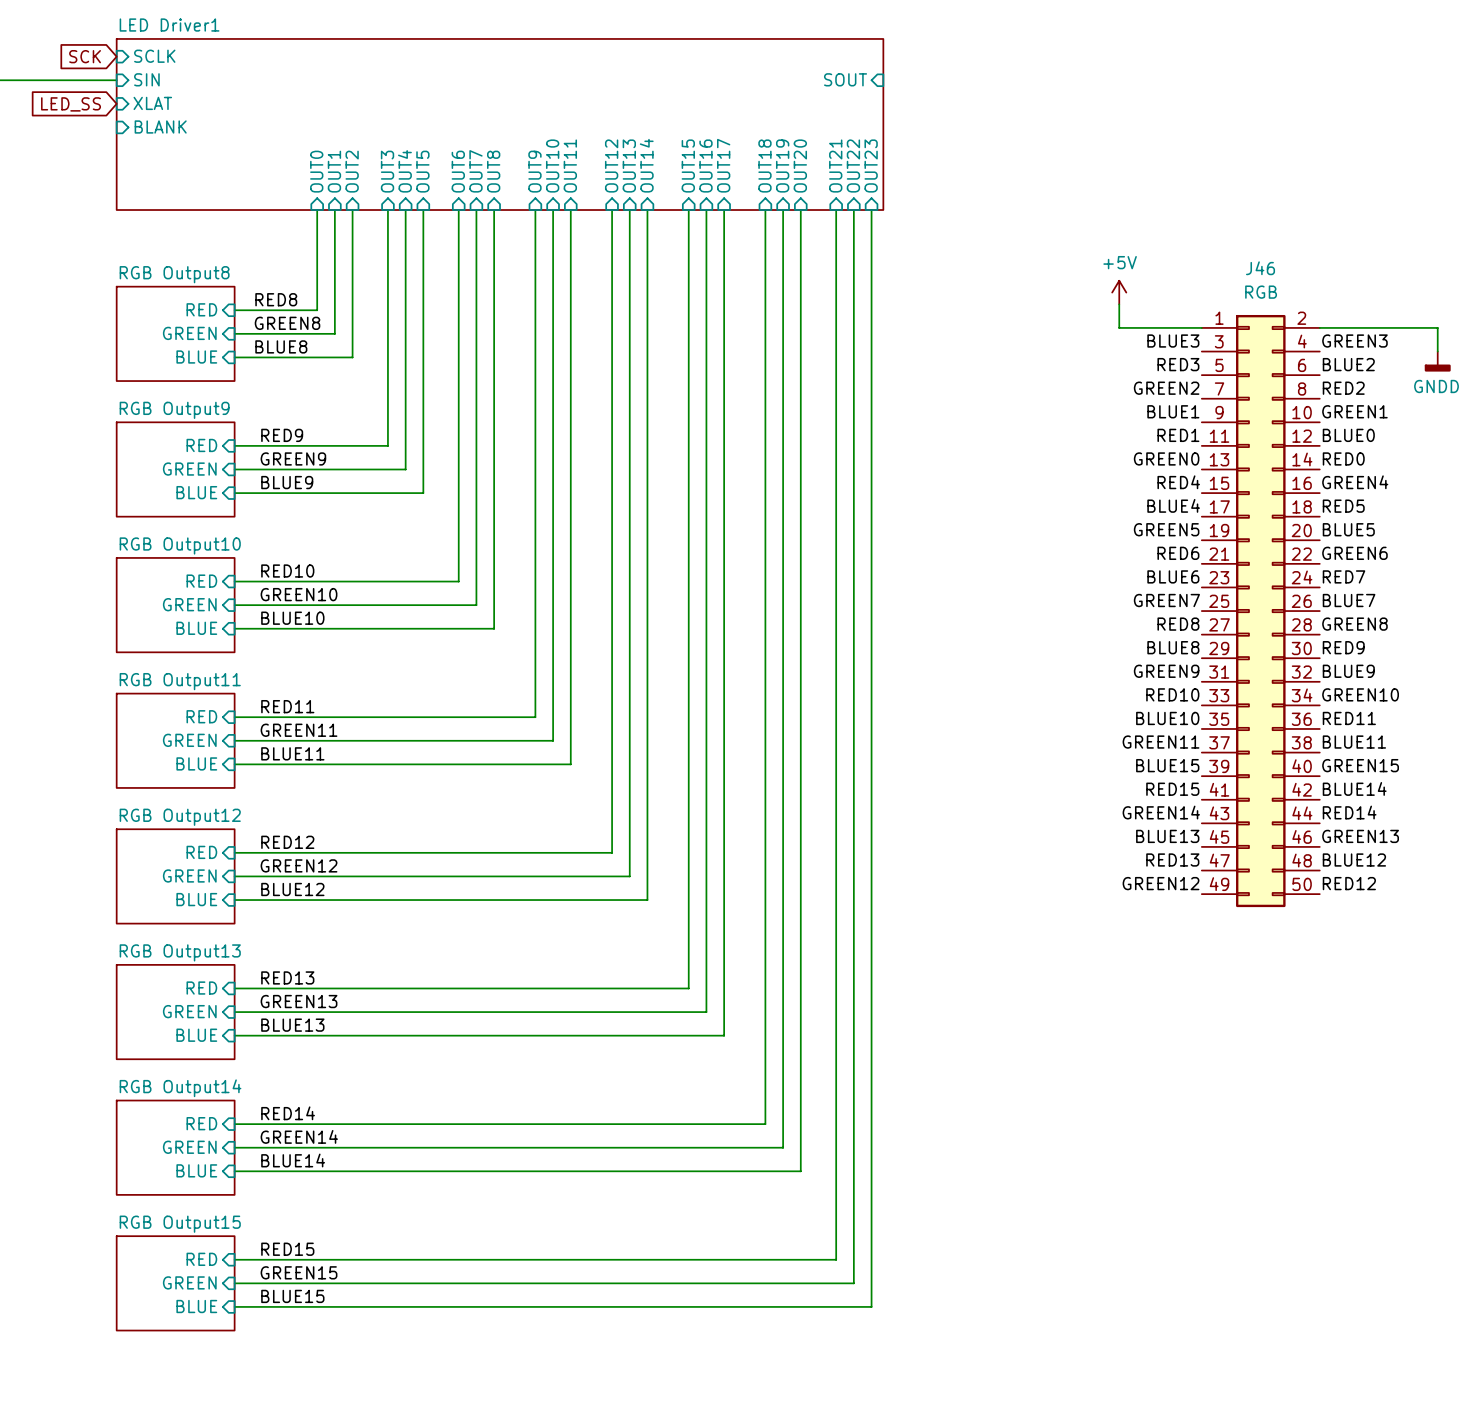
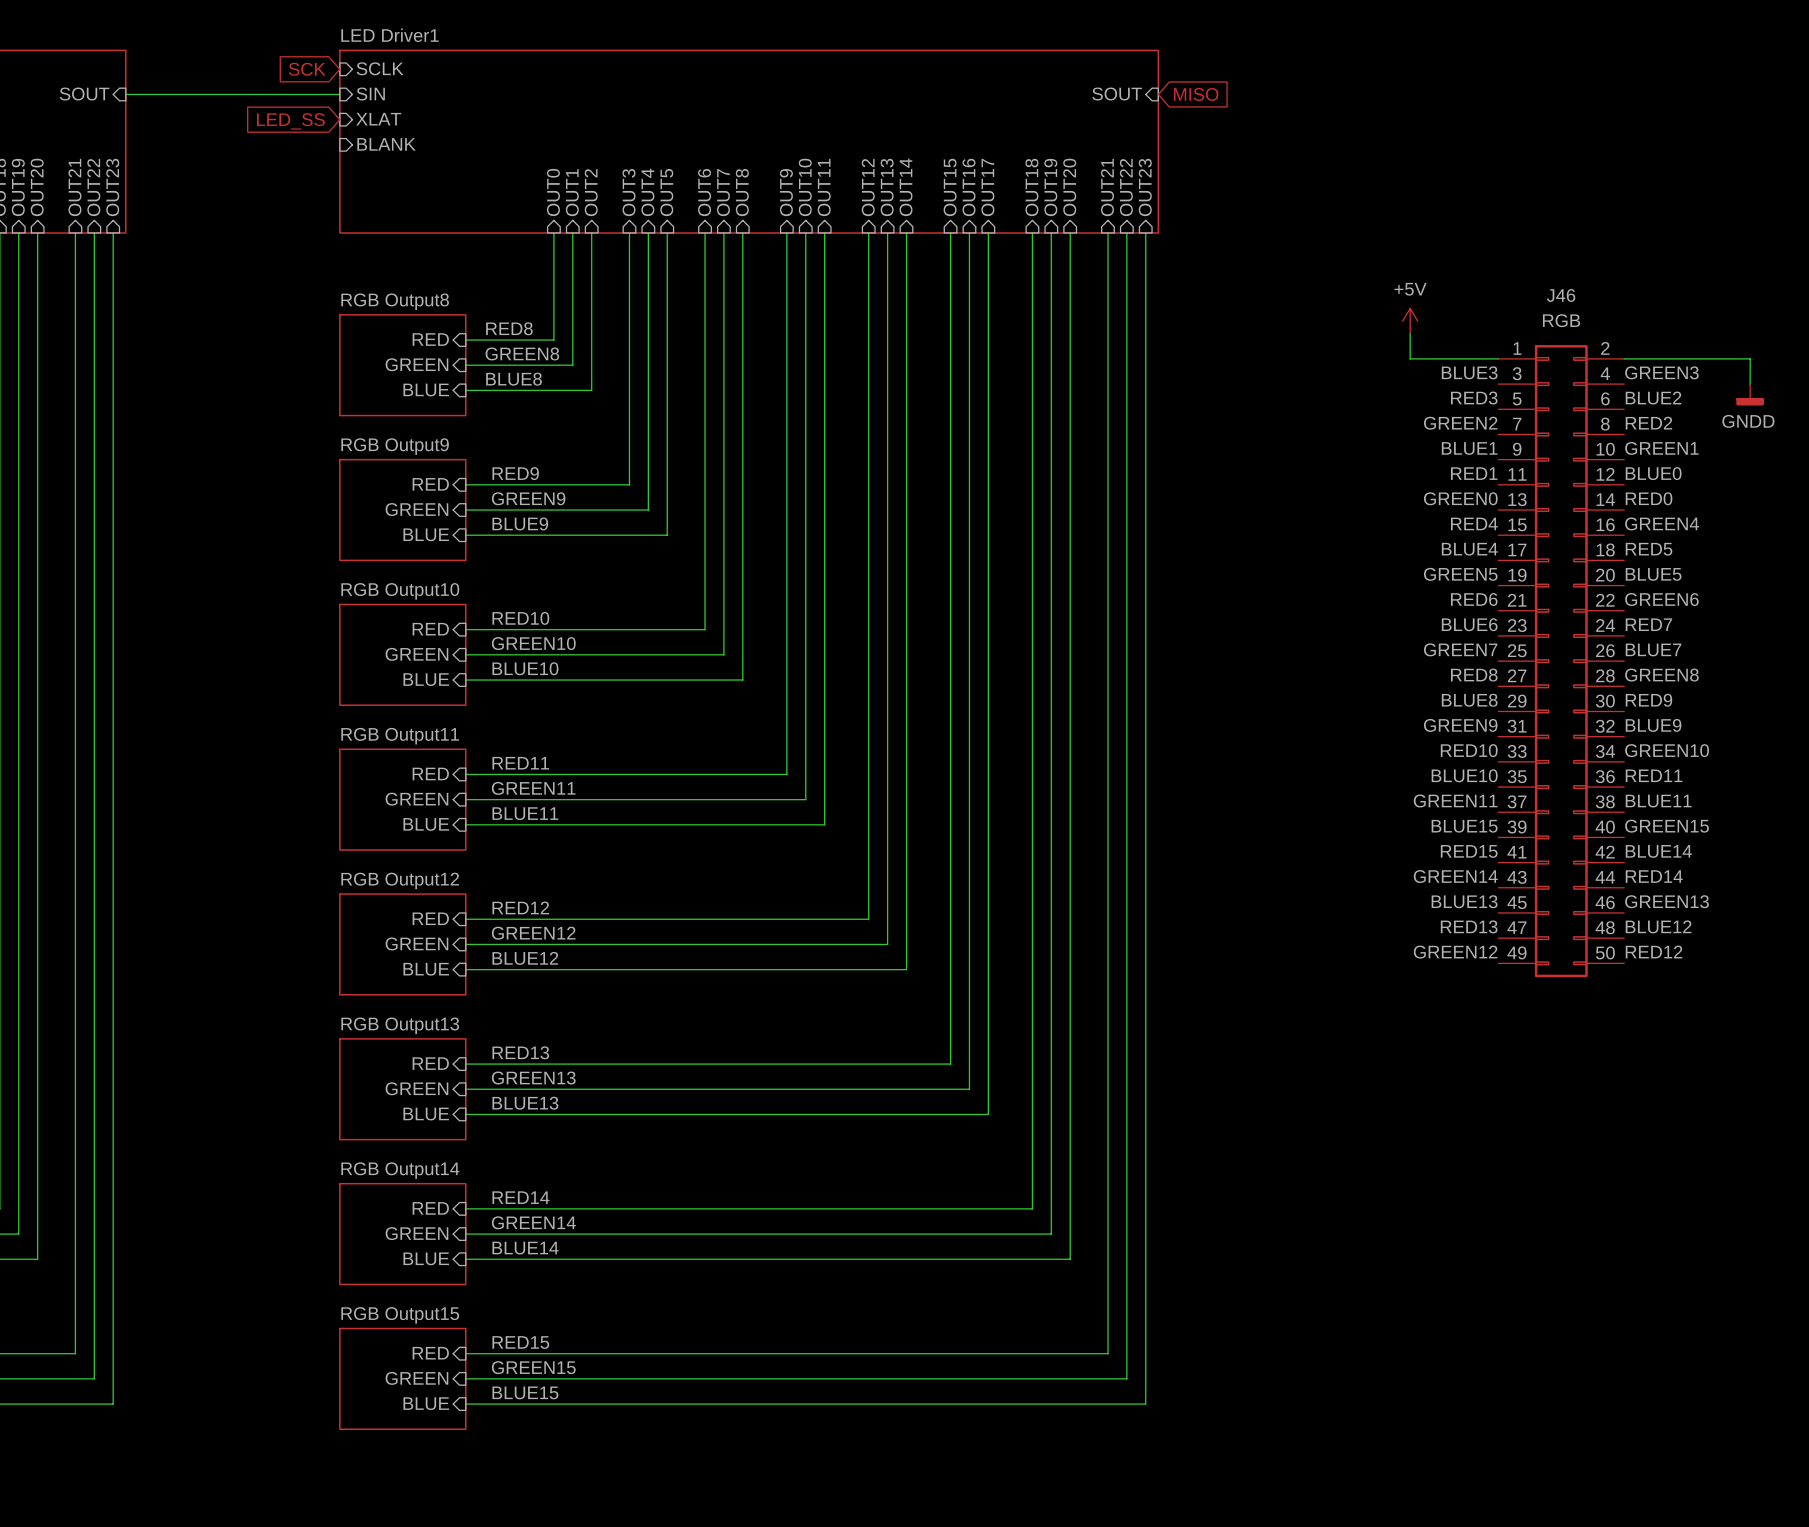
global label: none -> MISO (1196, 94)

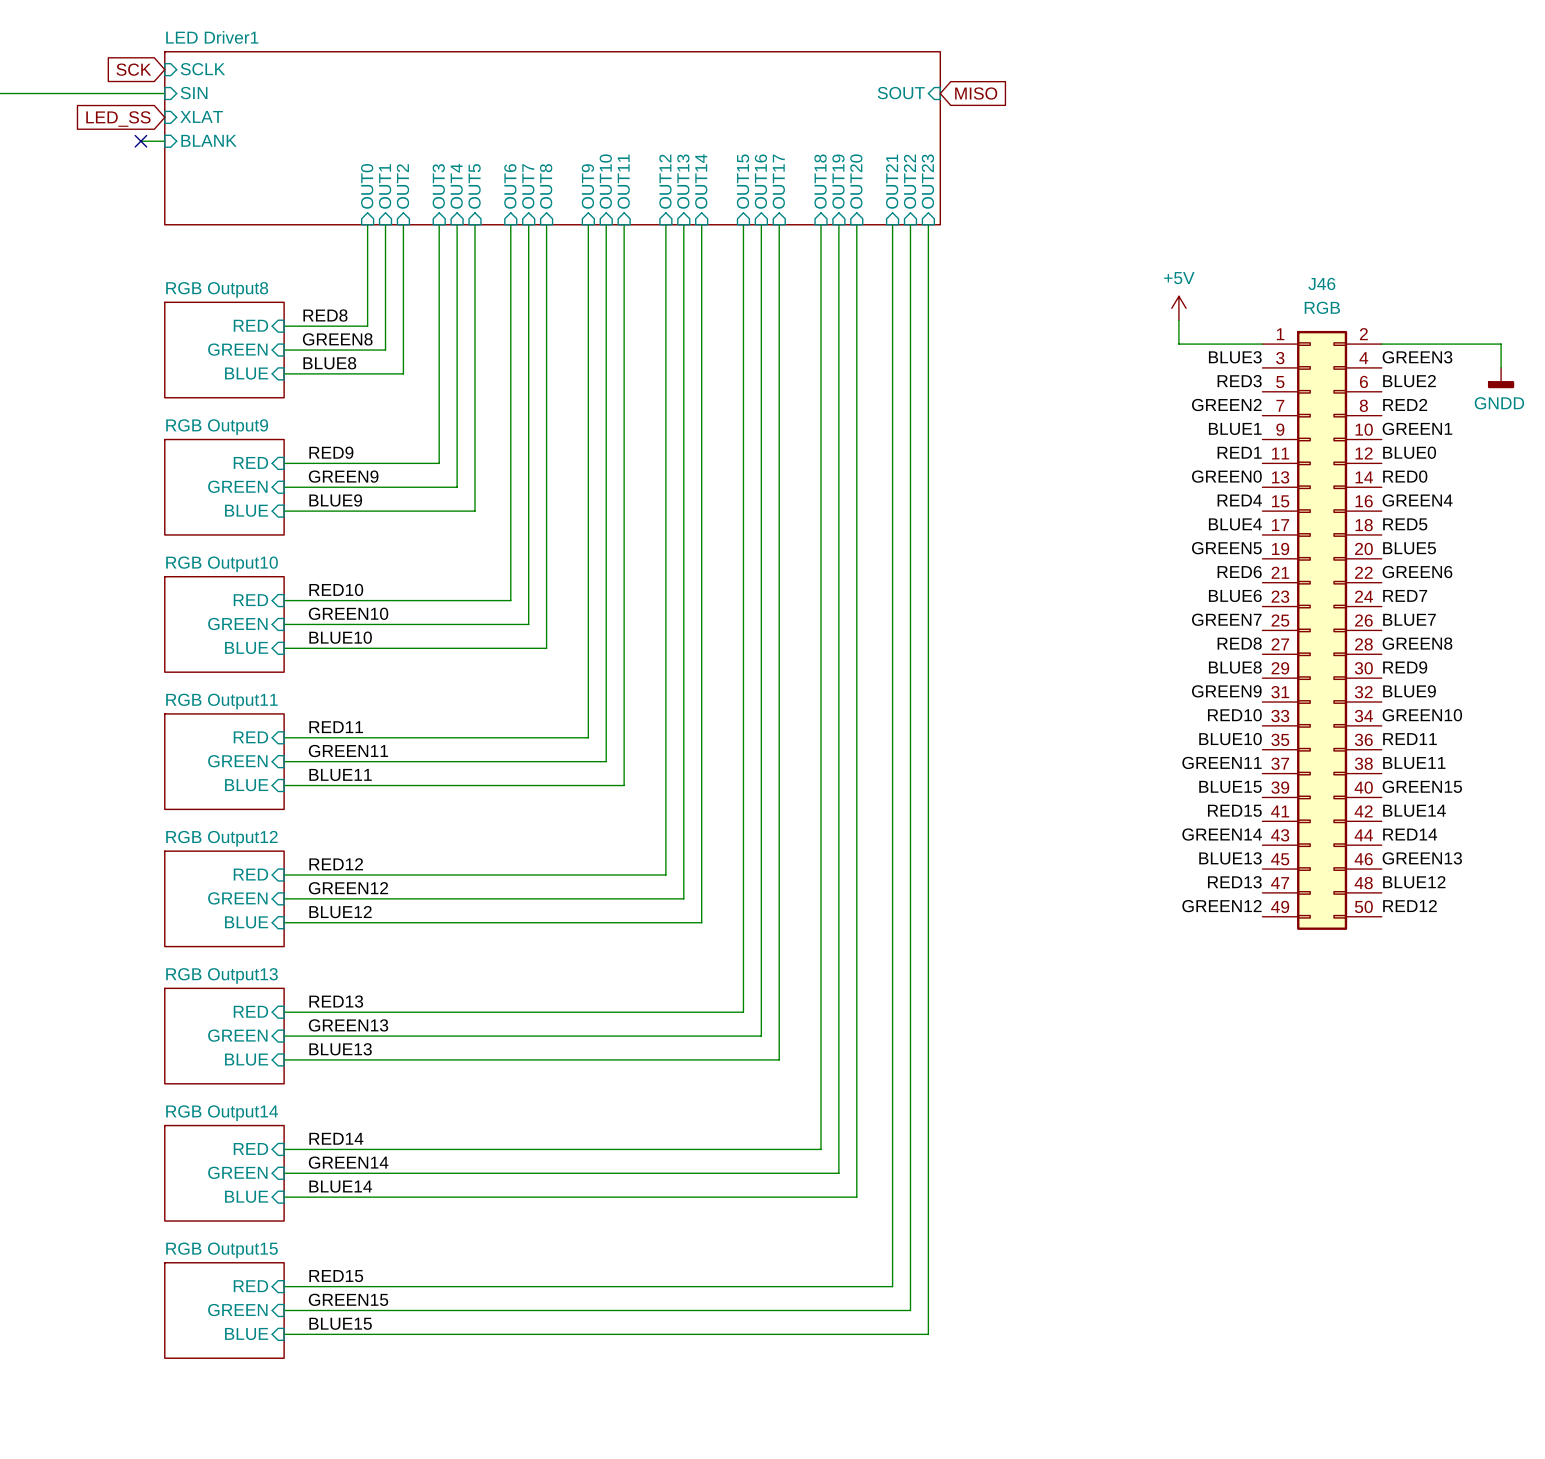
wire: none -> (140, 141) (164, 141)
no-connect mark: none -> (140, 141)

